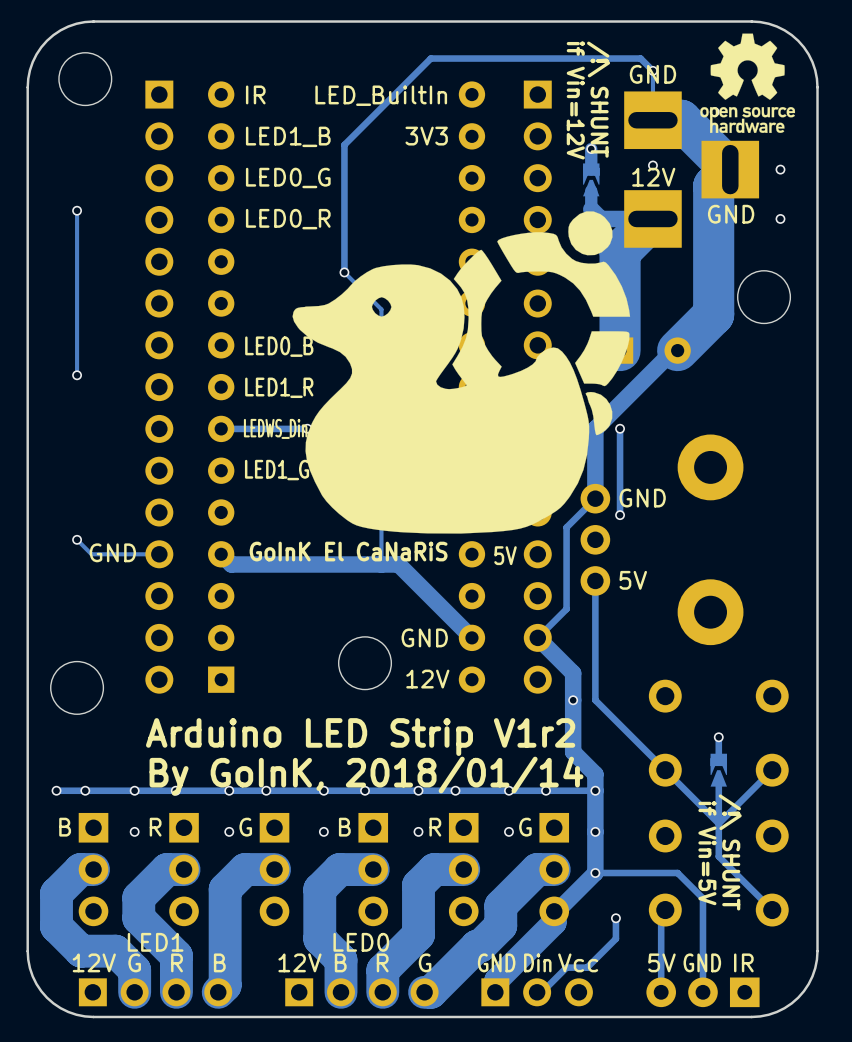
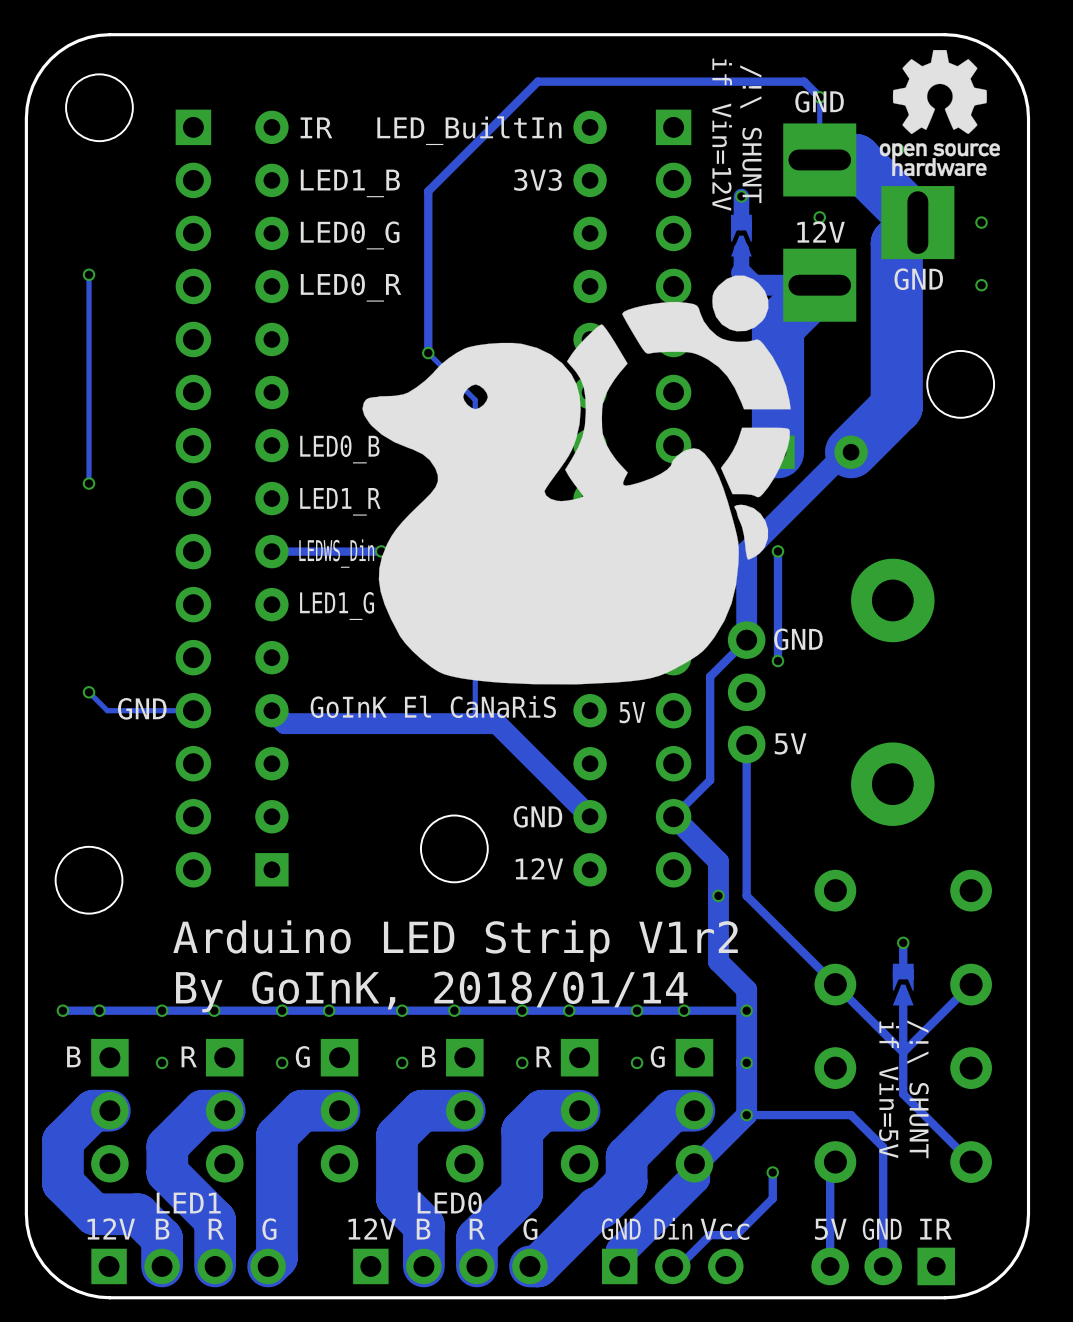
text: G (134, 962) -> B (162, 1229)
text: B (219, 962) -> G (269, 1229)

